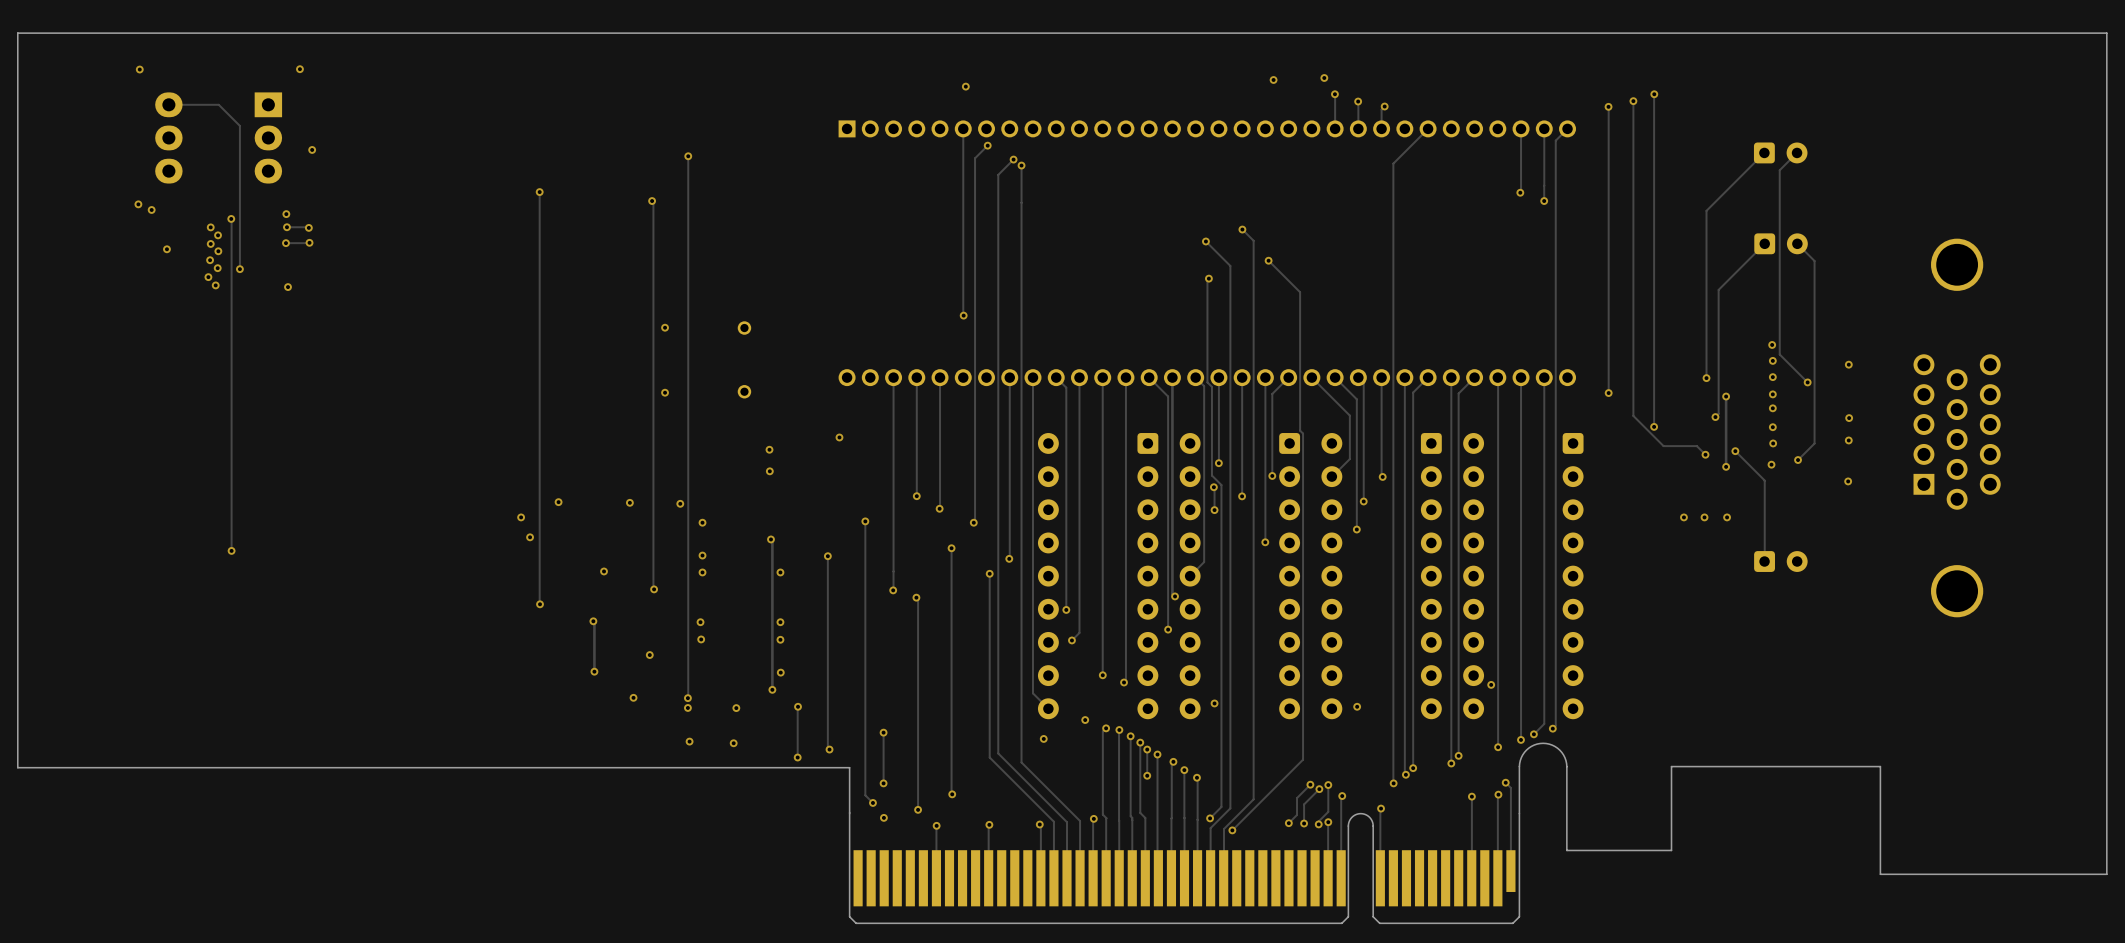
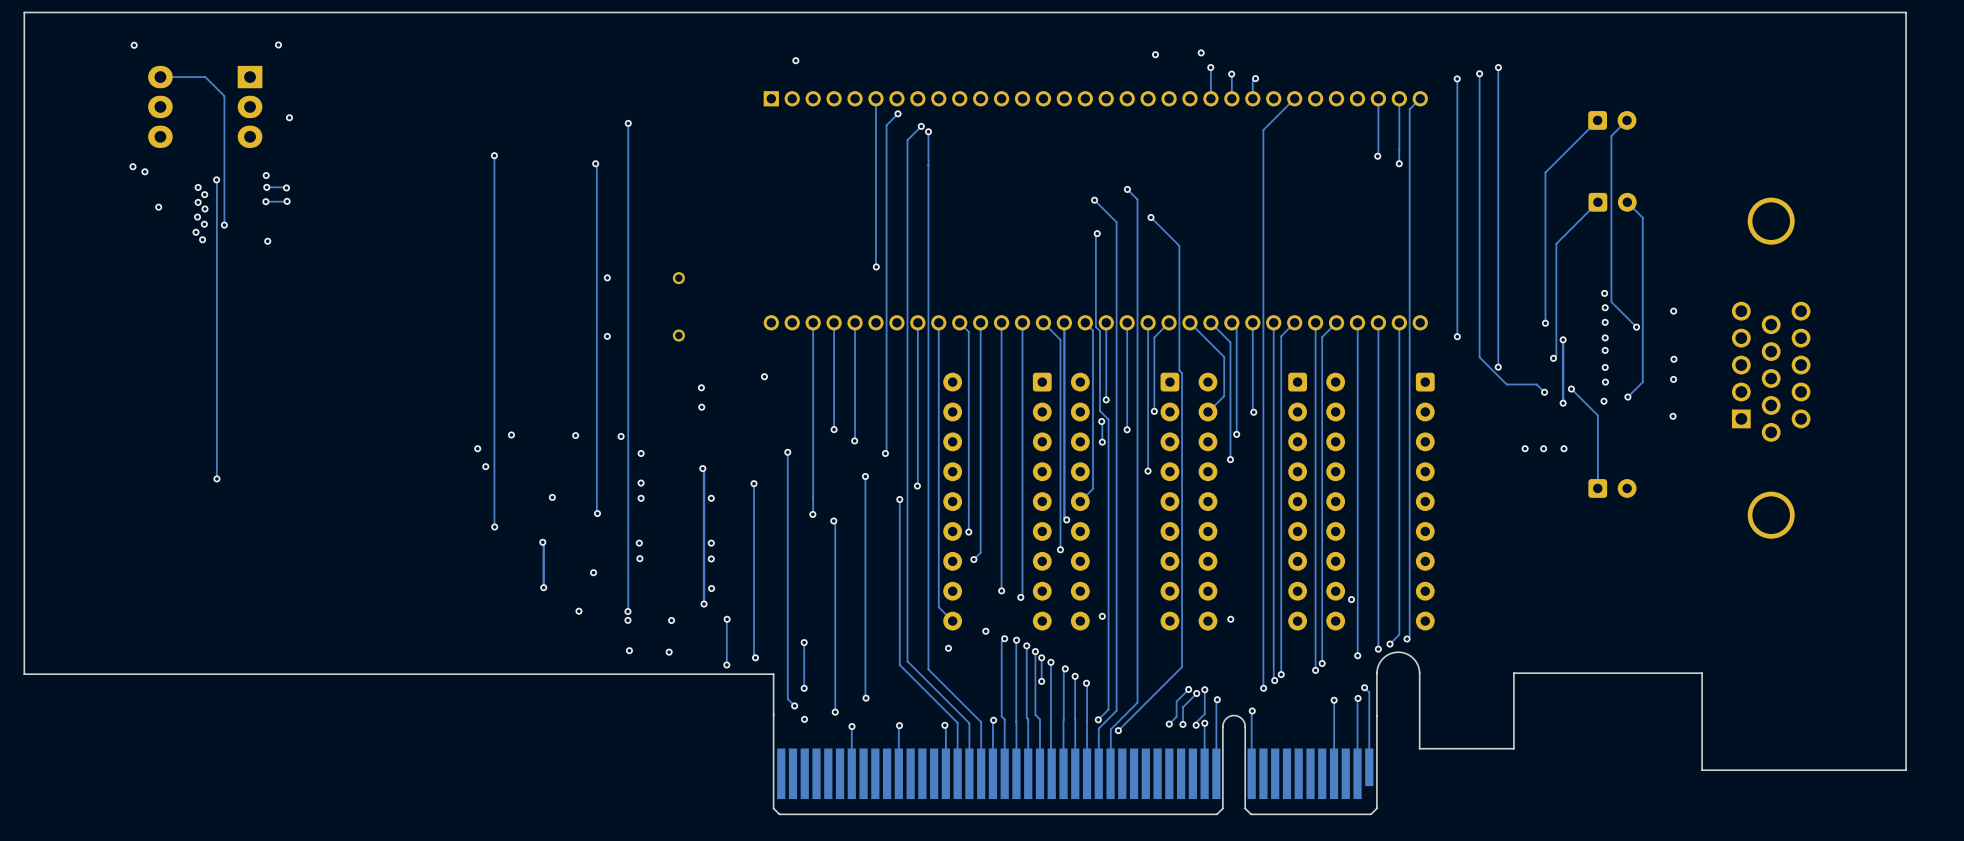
via: none -> (795, 60)
via: (965, 86) -> none

